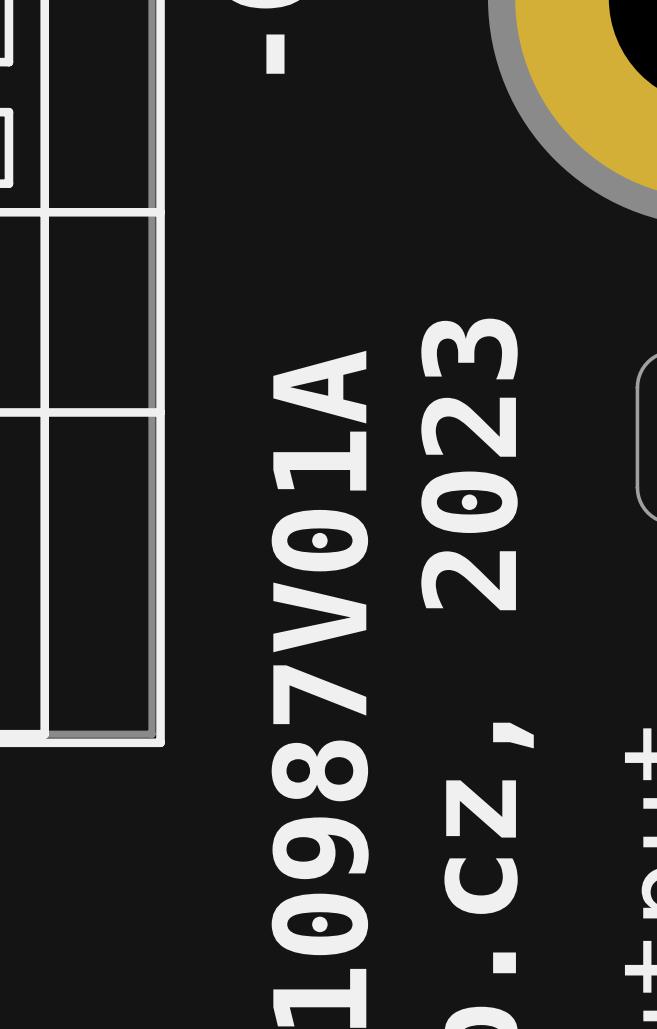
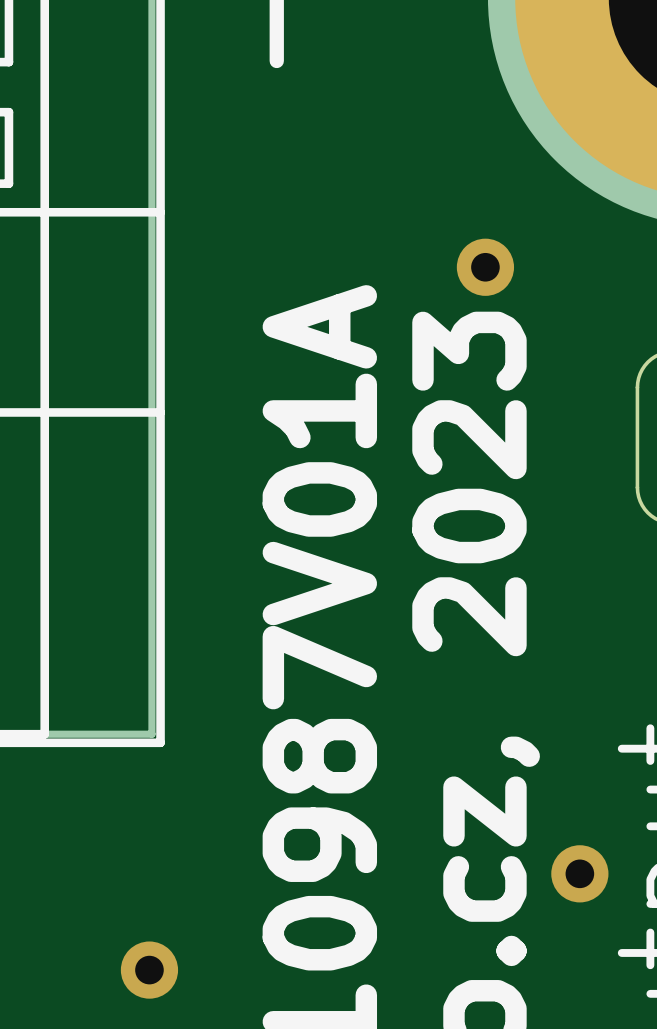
via: none -> (485, 267)
via: none -> (579, 873)
via: none -> (149, 970)

